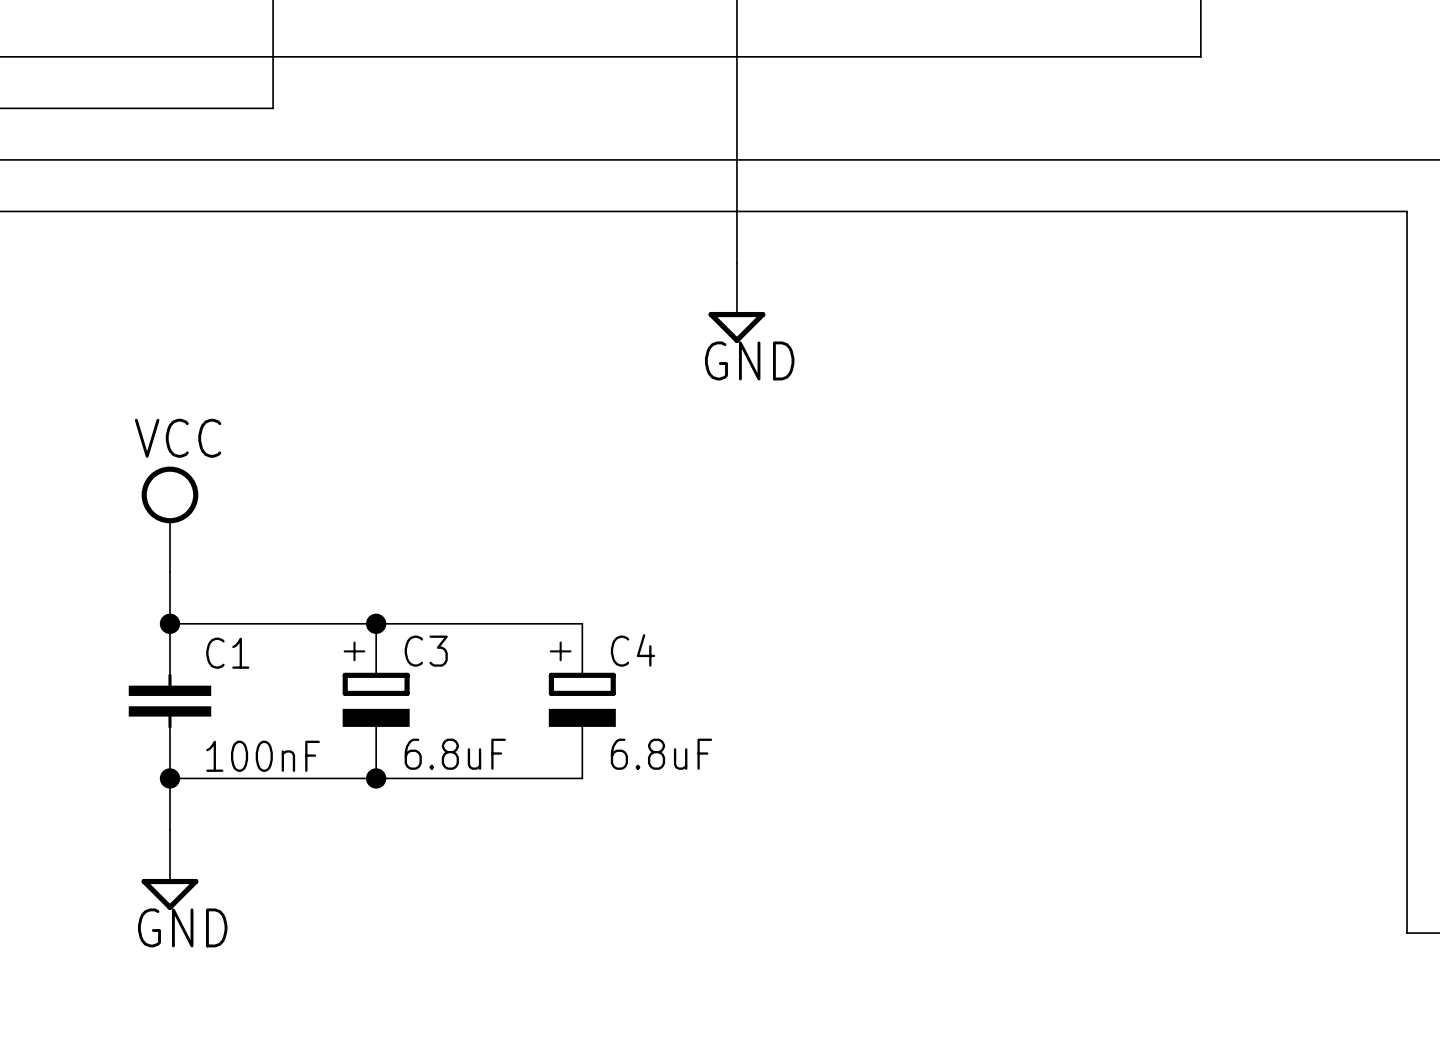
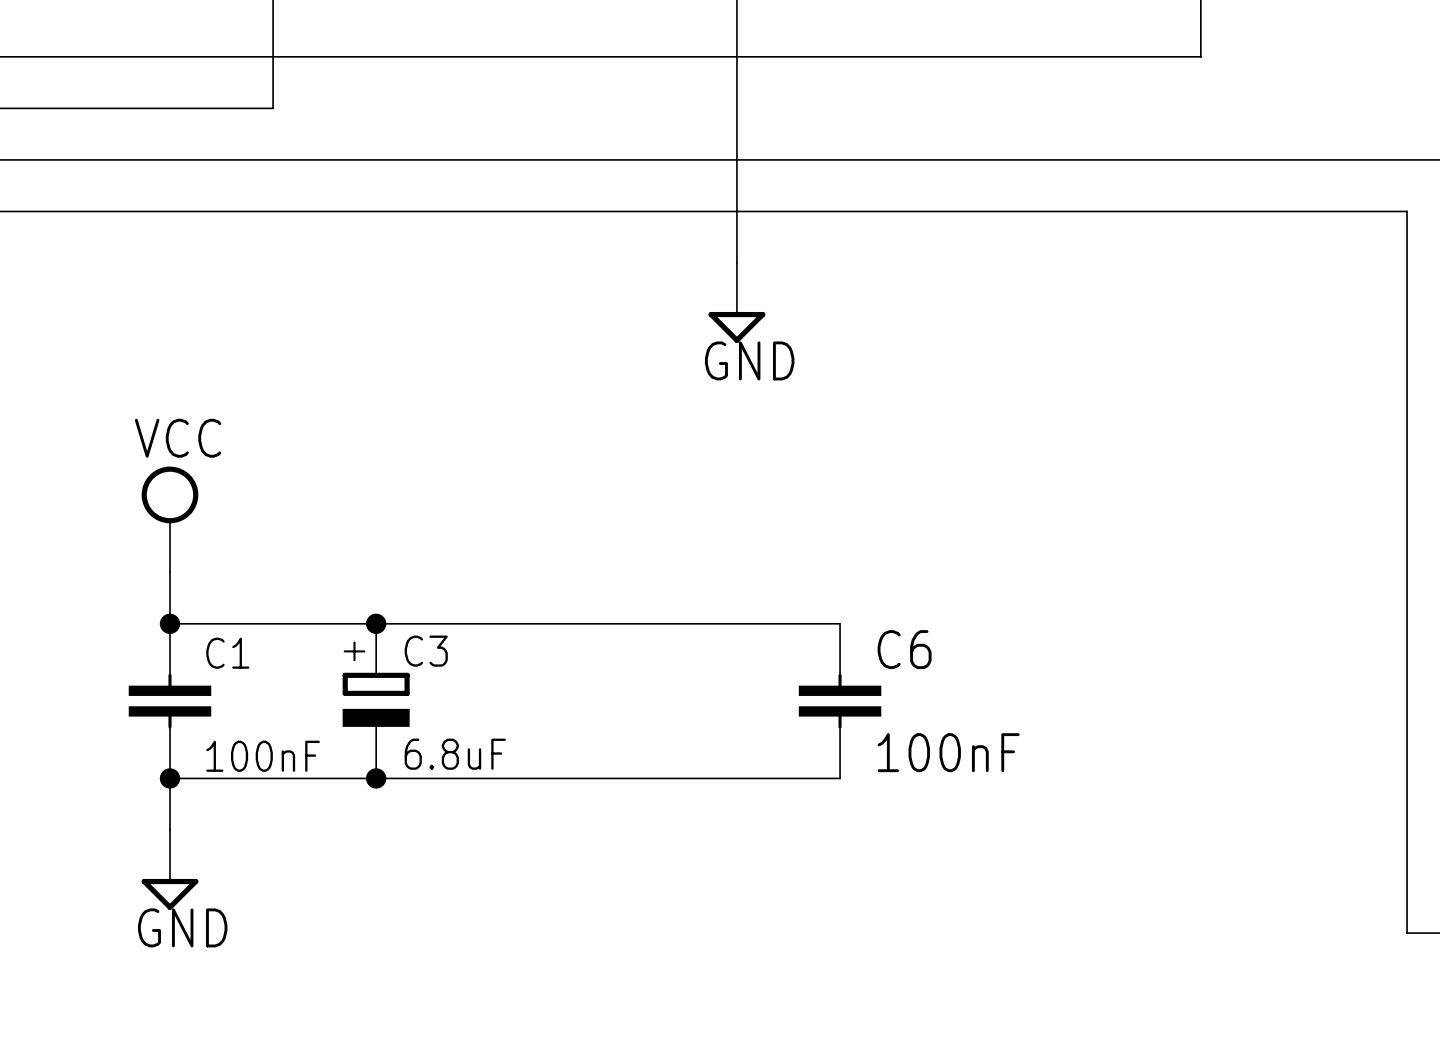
wire: none -> (582, 623) (840, 623)
C4: 6.8uF (582, 701) -> none
C6: none -> 100nF (840, 701)
wire: none -> (582, 778) (840, 778)

